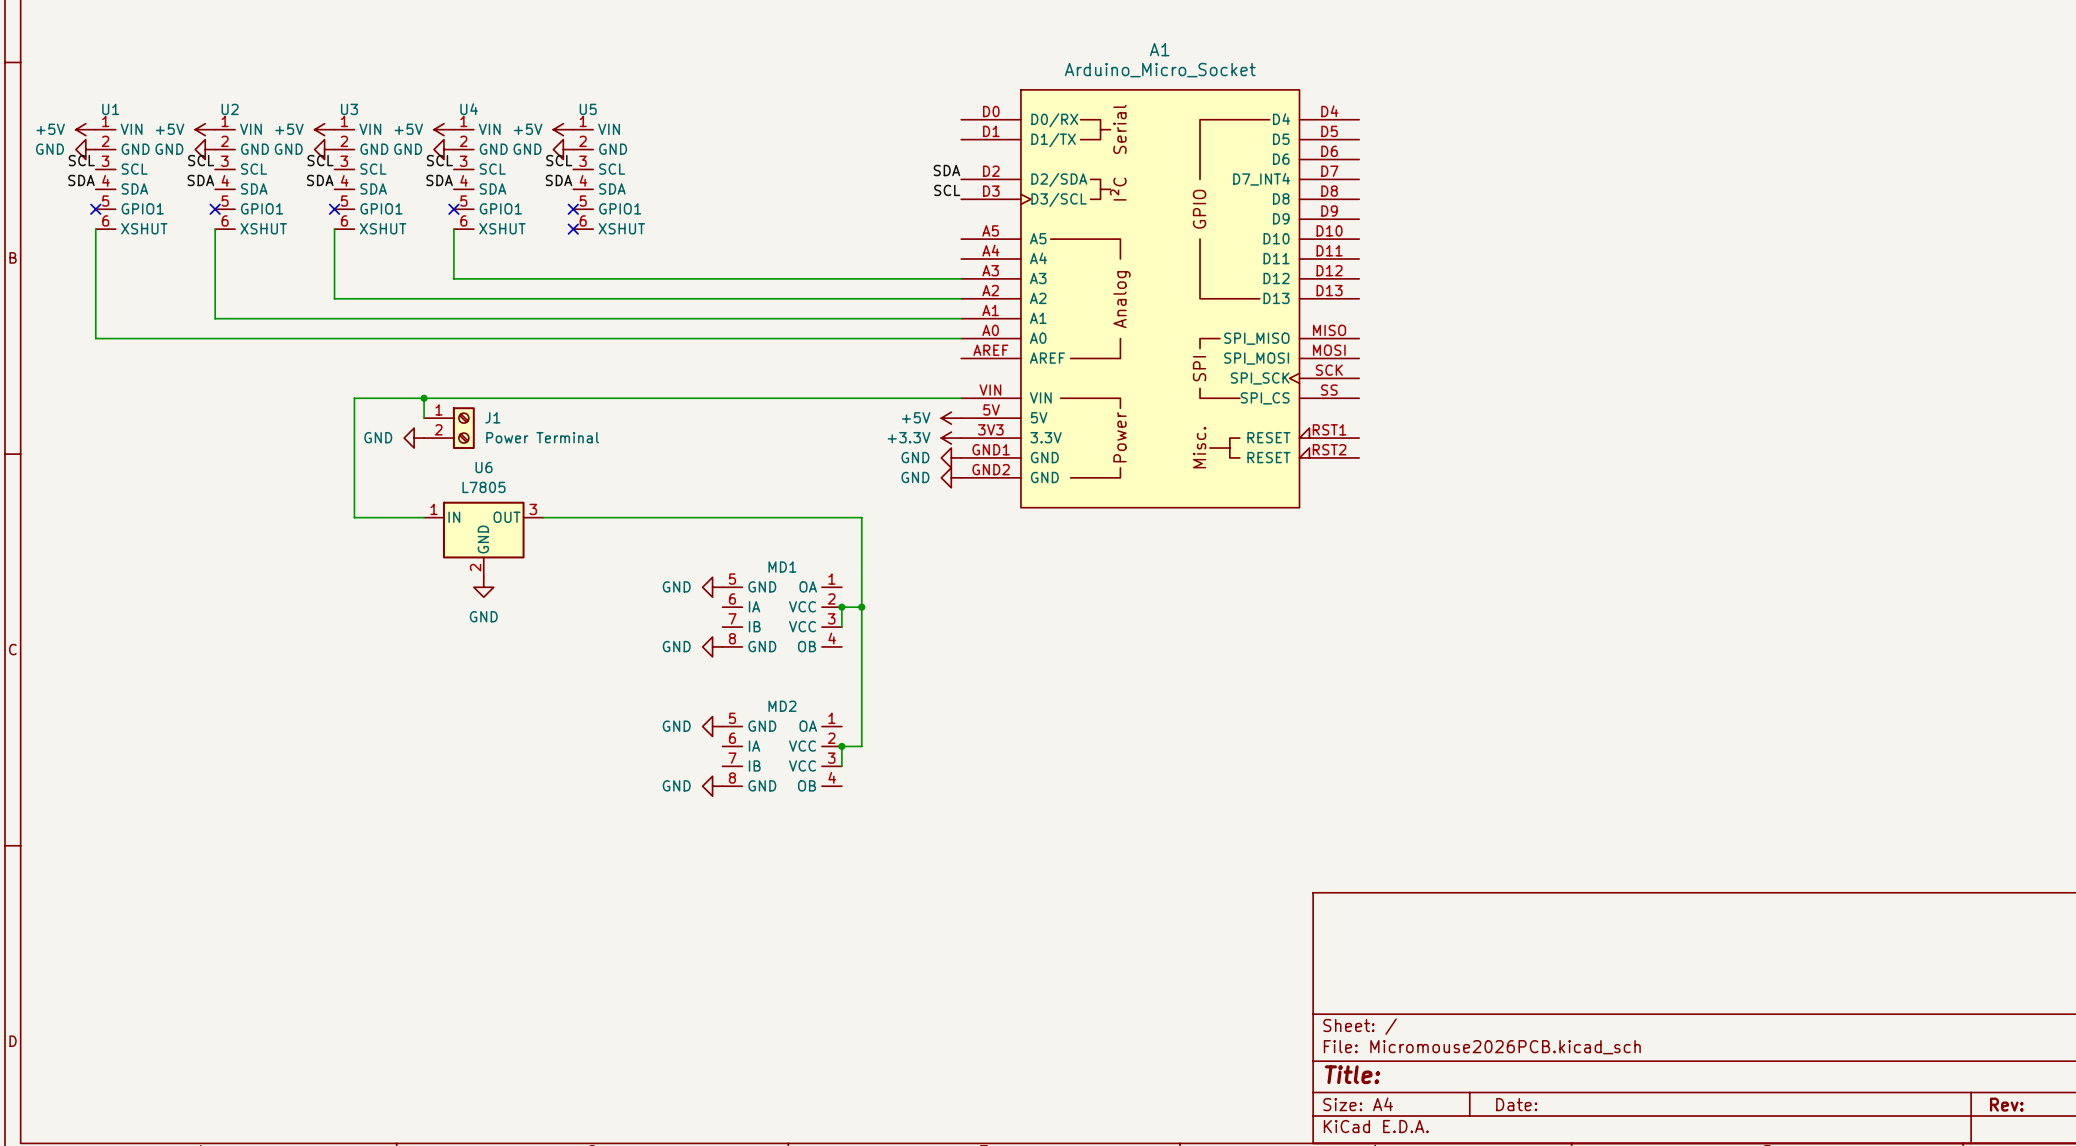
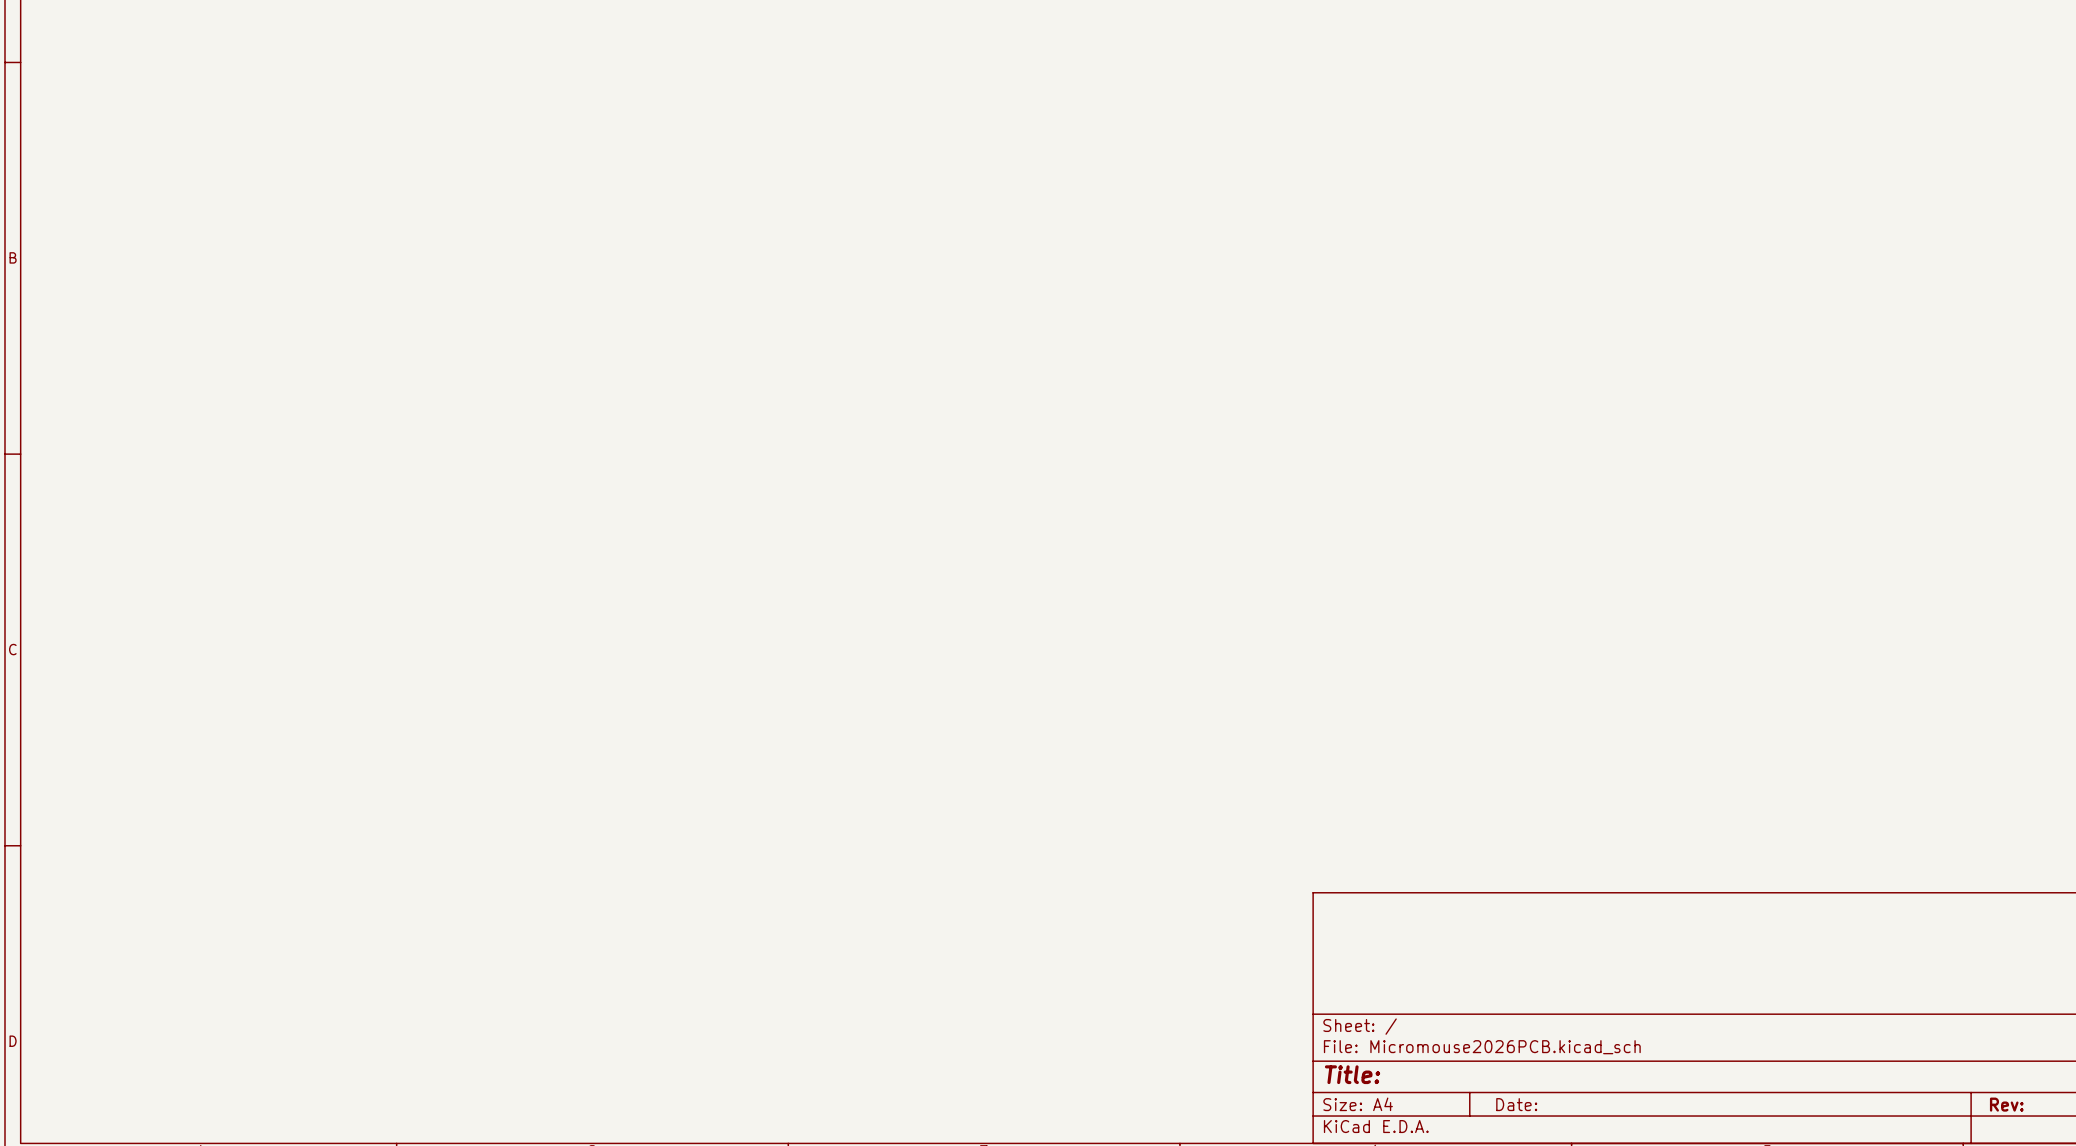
power symbol: +5V (85, 129) -> none
power symbol: +5V (205, 129) -> none
power symbol: +5V (324, 129) -> none
power symbol: +5V (443, 129) -> none
power symbol: +5V (563, 129) -> none
power symbol: GND (85, 149) -> none
power symbol: GND (205, 149) -> none
power symbol: GND (324, 149) -> none
power symbol: GND (443, 149) -> none
power symbol: GND (563, 149) -> none
label: SCL (81, 160) -> none
label: SCL (201, 160) -> none
label: SCL (320, 160) -> none
label: SCL (439, 160) -> none
label: SCL (559, 160) -> none
label: SDA (946, 170) -> none
U1: (105, 179) -> none
U2: (225, 179) -> none
U3: (344, 179) -> none
U4: (463, 179) -> none
U5: (583, 179) -> none
label: SDA (81, 180) -> none
label: SDA (200, 180) -> none
label: SDA (320, 180) -> none
label: SDA (439, 180) -> none
label: SDA (559, 180) -> none
label: SCL (947, 190) -> none
no-connect mark: (95, 209) -> none
no-connect mark: (215, 209) -> none
no-connect mark: (334, 209) -> none
no-connect mark: (453, 209) -> none
no-connect mark: (573, 209) -> none
wire: (95, 229) (95, 338) (961, 338) -> none
wire: (215, 229) (215, 318) (961, 318) -> none
wire: (334, 229) (334, 298) (961, 298) -> none
wire: (453, 229) (453, 278) (961, 278) -> none
no-connect mark: (573, 229) -> none
A1: Arduino_Micro_Socket (1160, 298) -> none
wire: (424, 398) (424, 418) -> none
junction: (424, 398) -> none
wire: (961, 398) (354, 398) (354, 517) (424, 517) -> none
power symbol: +5V (951, 418) -> none
J1: Power Terminal (449, 428) -> none
power symbol: GND (414, 438) -> none
power symbol: +3.3V (951, 438) -> none
power symbol: GND (951, 457) -> none
power symbol: GND (951, 477) -> none
wire: (543, 517) (861, 517) (861, 746) (841, 746) (841, 766) -> none
U6: L7805 (483, 539) -> none
power symbol: GND (483, 587) -> none
power symbol: GND (712, 587) -> none
junction: (841, 607) -> none
wire: (861, 607) (841, 607) (841, 627) -> none
junction: (861, 607) -> none
MD1: (782, 617) -> none
power symbol: GND (712, 646) -> none
power symbol: GND (712, 726) -> none
junction: (841, 746) -> none
MD2: (782, 756) -> none
power symbol: GND (712, 786) -> none

